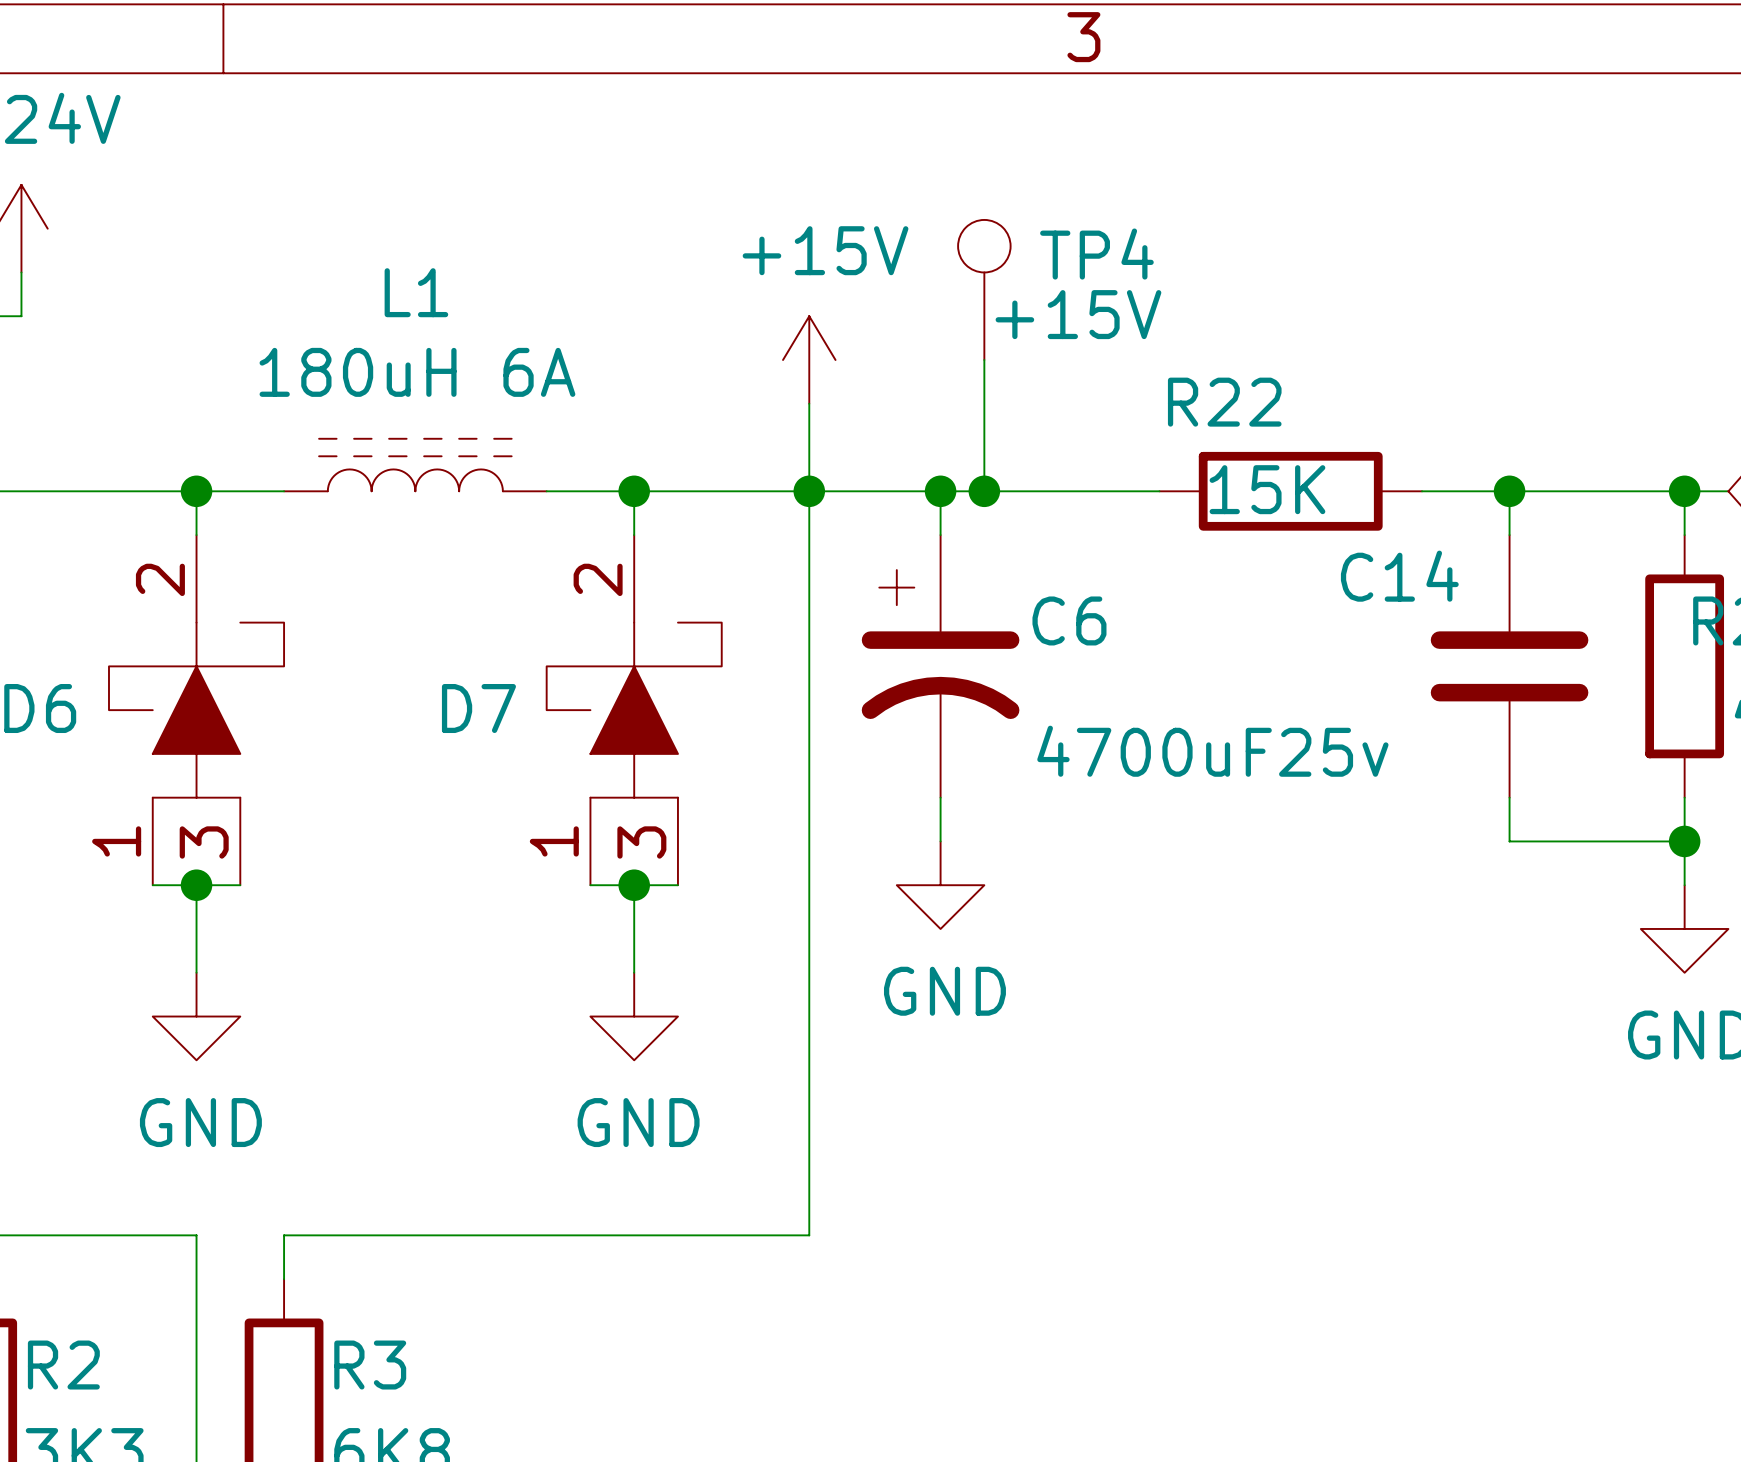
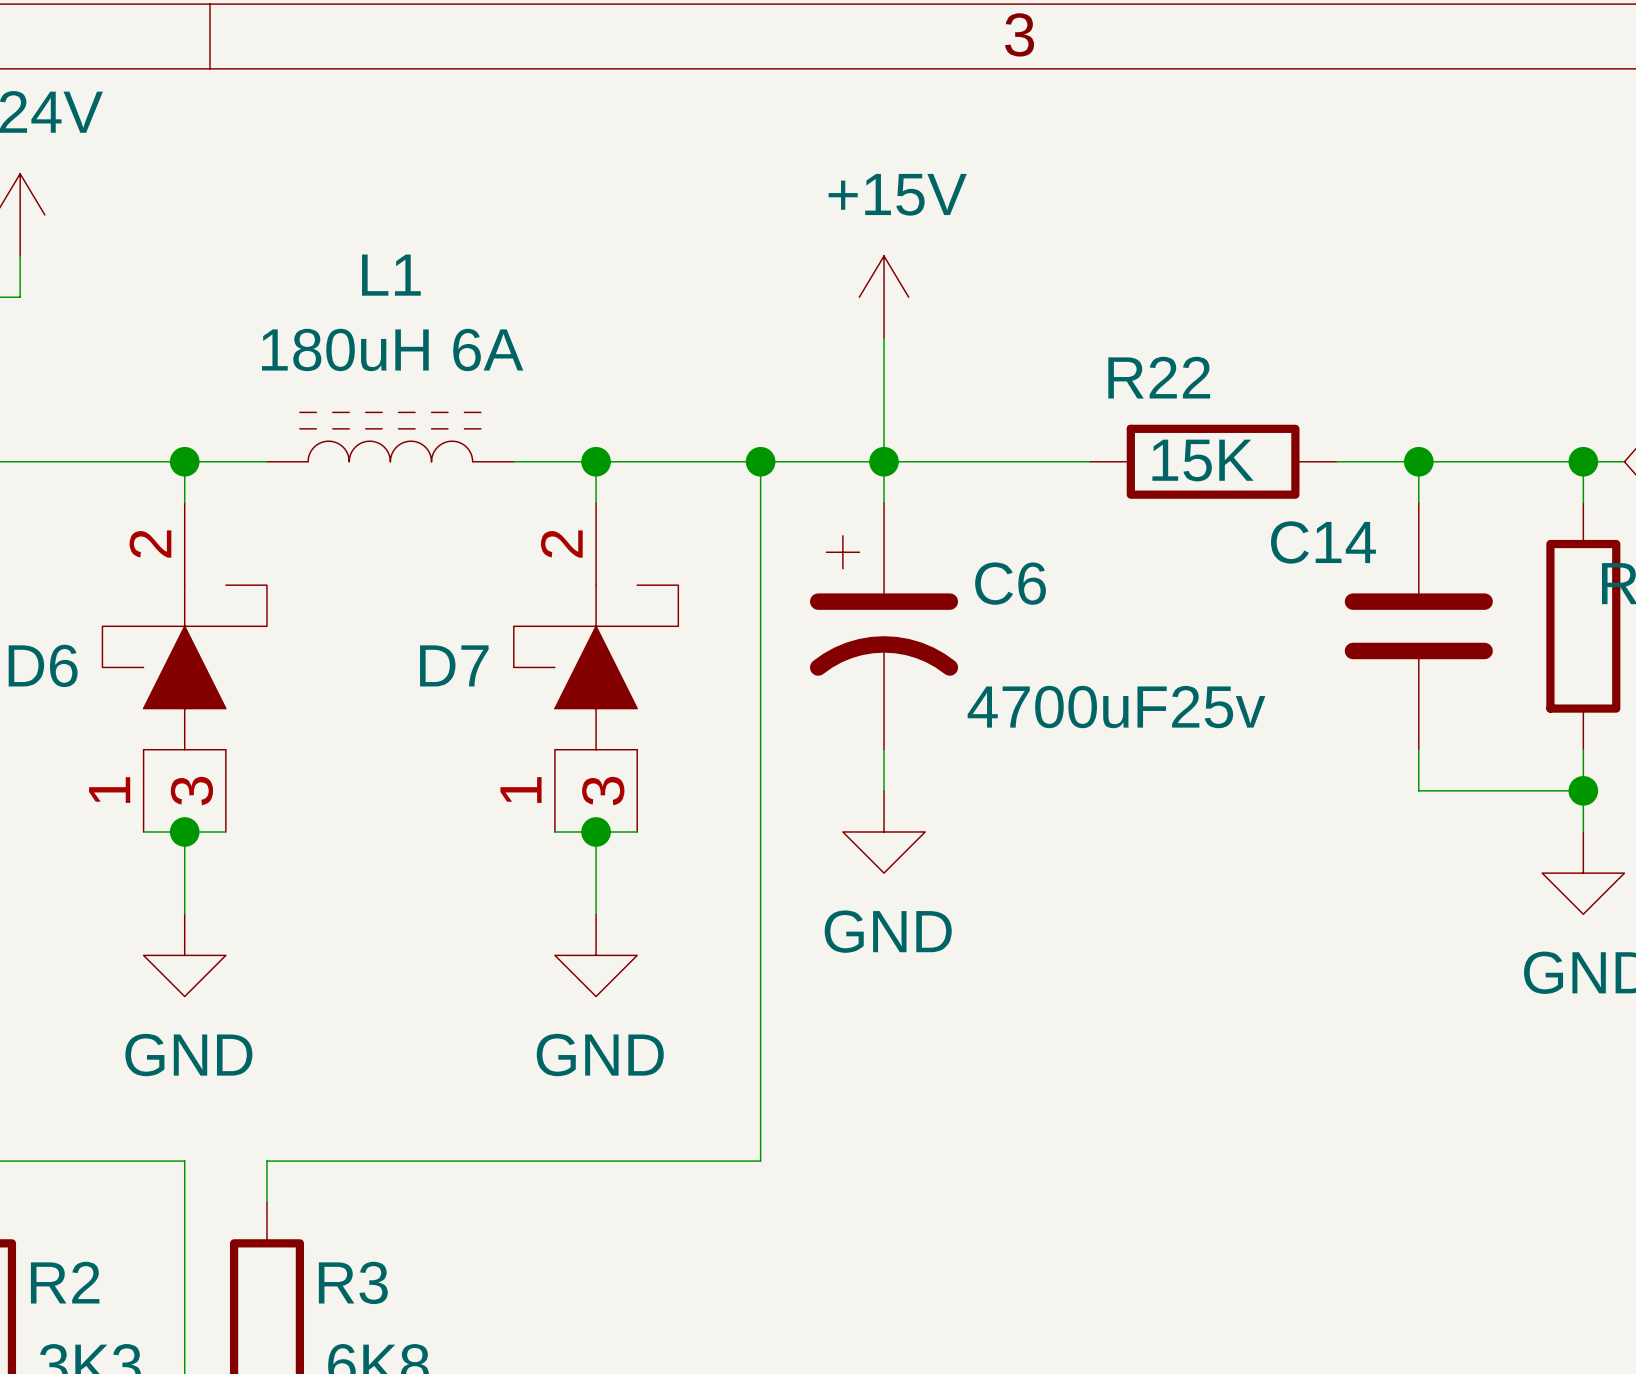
TP4: +15V (984, 289) -> none
power symbol position: +15V (809, 360) -> +15V (884, 297)
wire: (984, 360) (984, 491) -> (884, 338) (884, 461)
wire: (809, 403) (809, 491) -> none
junction: (984, 491) -> none

